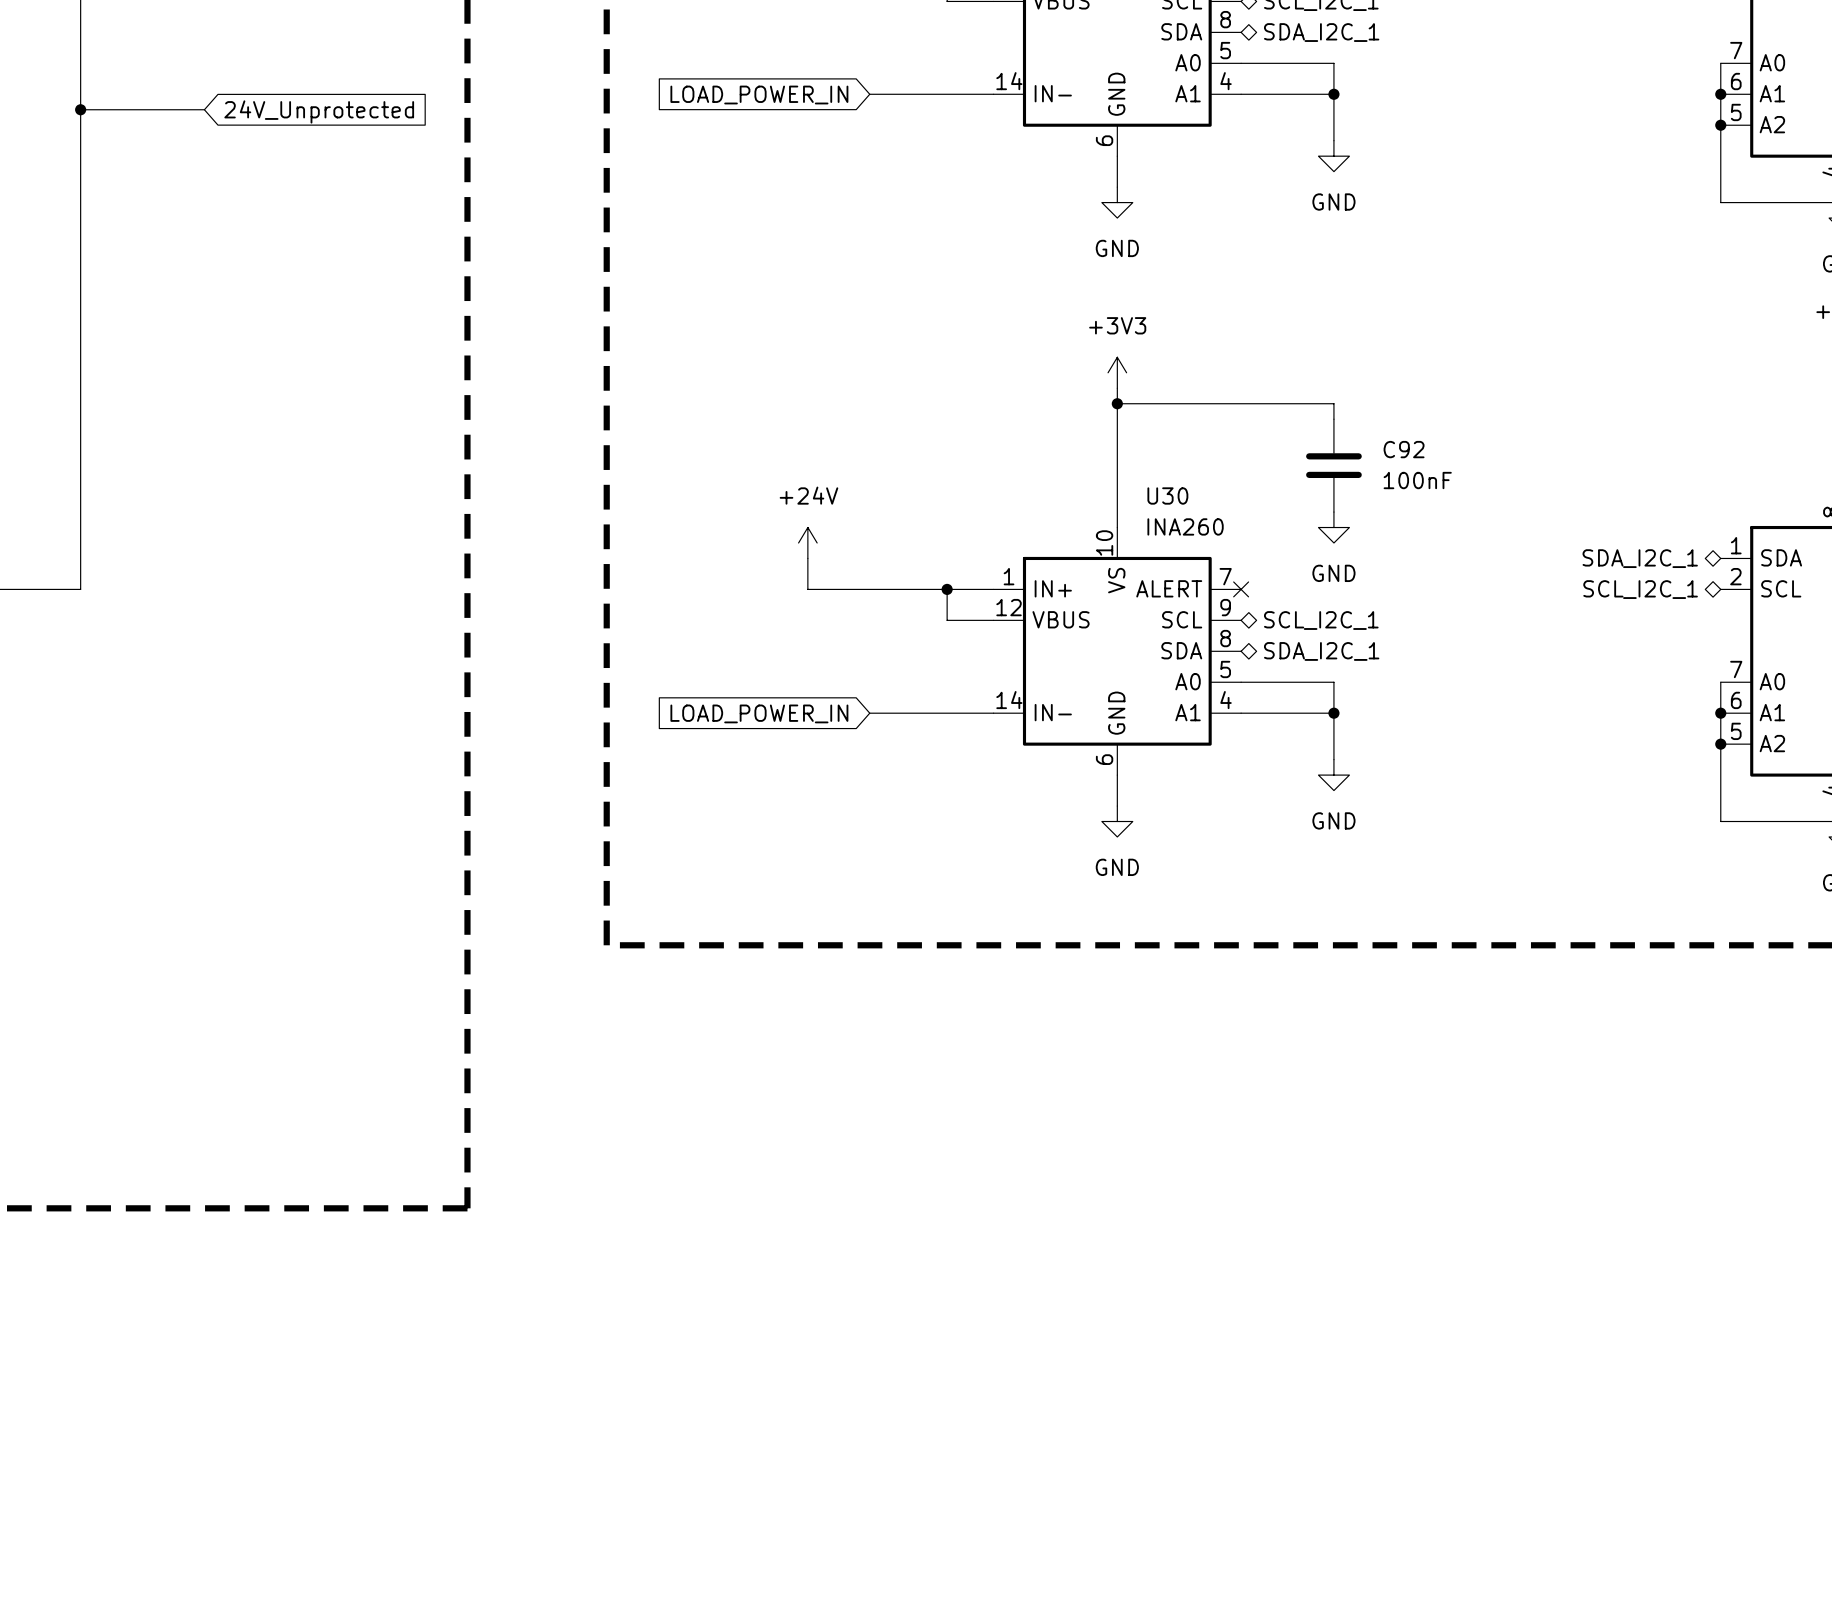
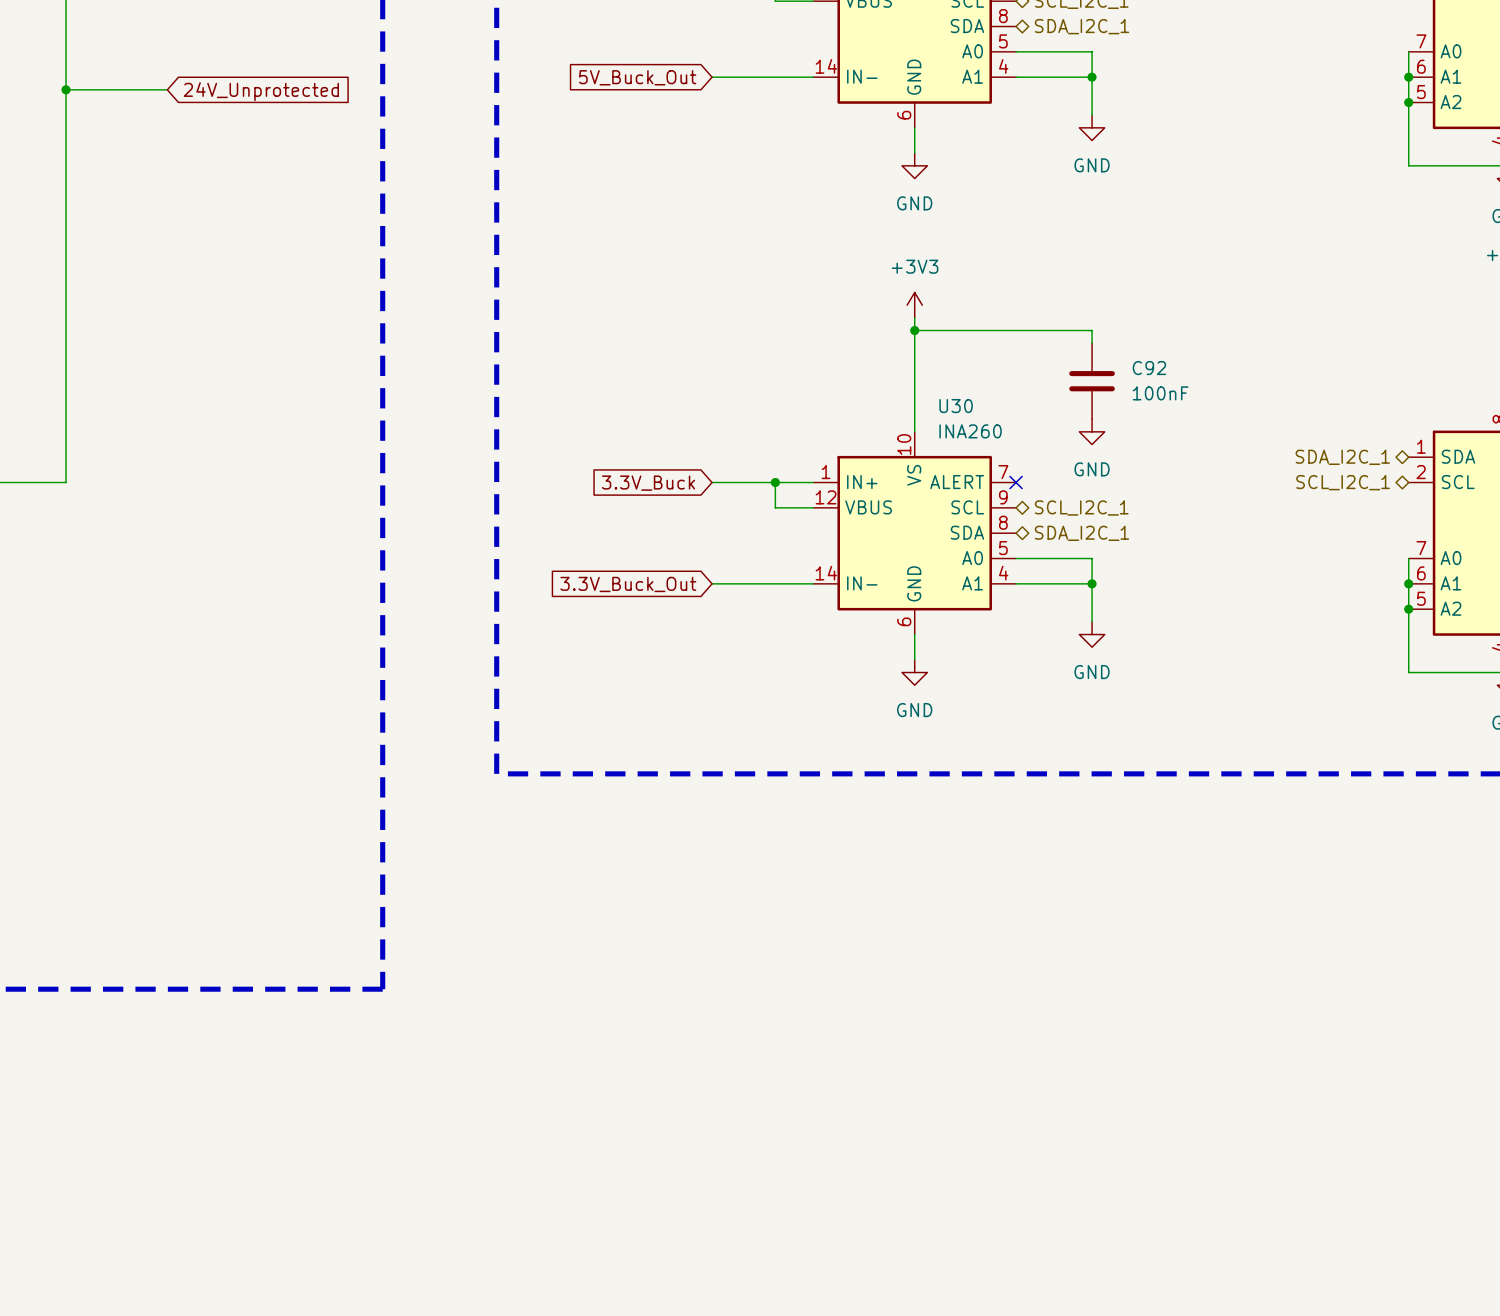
global label: LOAD_POWER_IN (759, 95) -> 5V_Buck_Out (637, 77)
power symbol: +24V (807, 542) -> none
wire: (807, 558) (807, 589) (869, 589) -> none
global label: none -> 3.3V_Buck (648, 483)
global label: LOAD_POWER_IN (759, 713) -> 3.3V_Buck_Out (628, 584)

